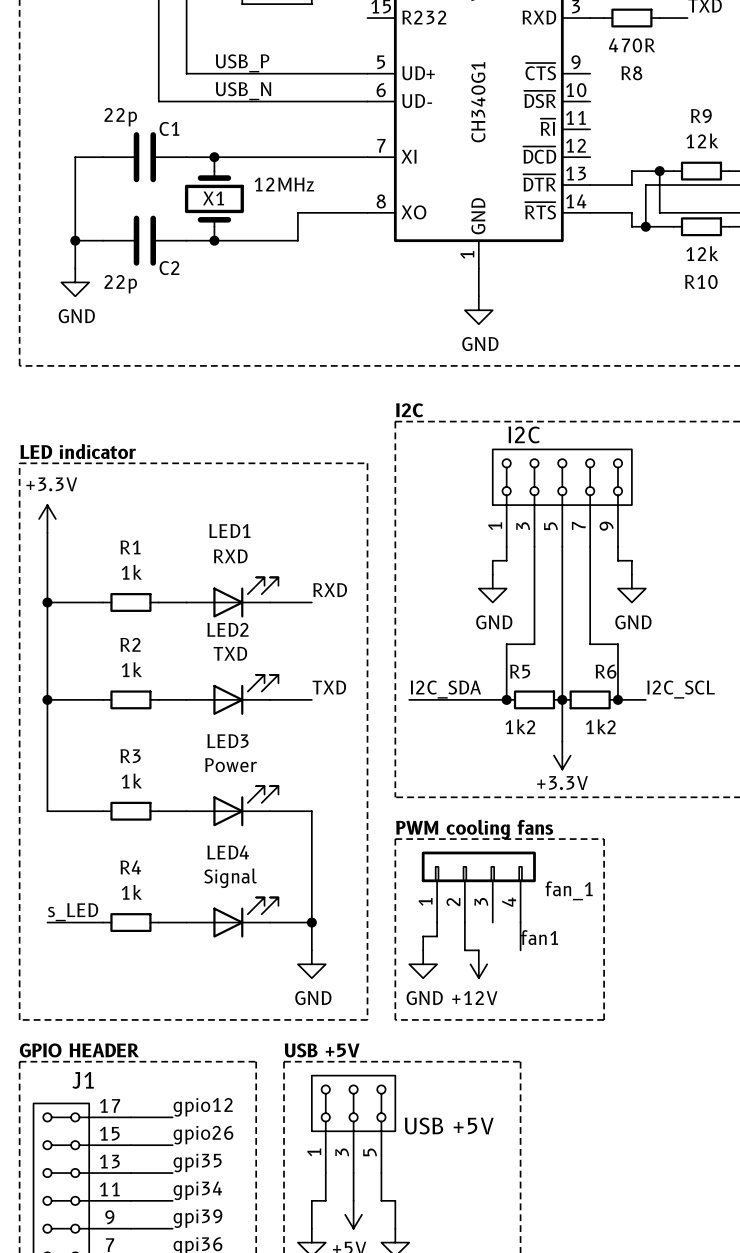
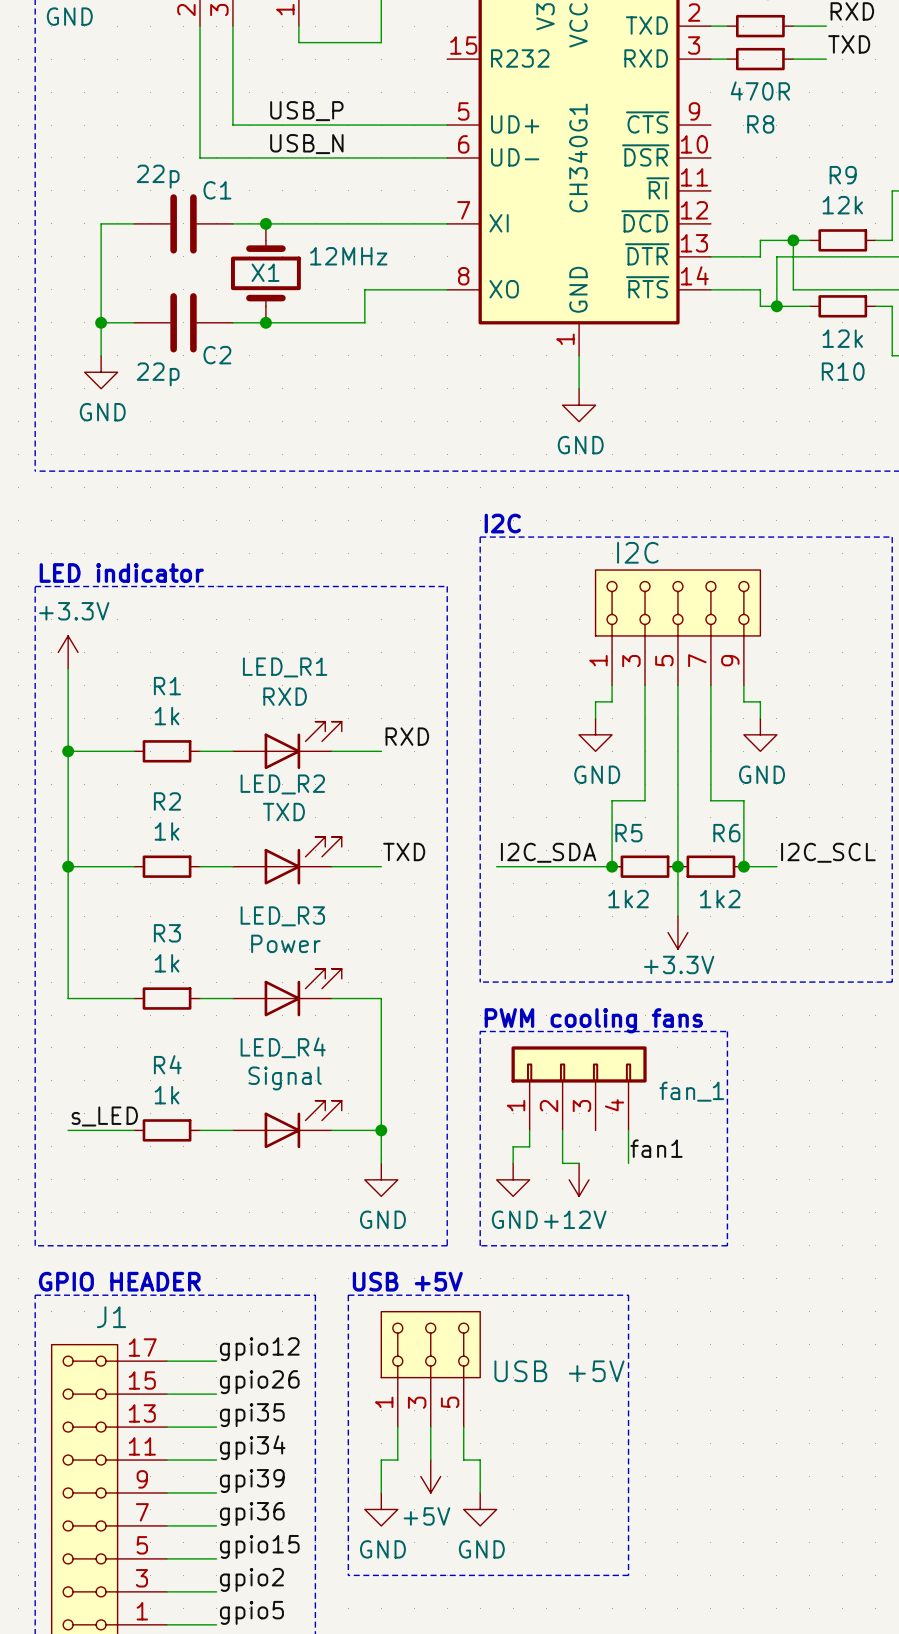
LED1 name: LED1 (229, 531) -> LED_R1 (285, 667)
LED2 name: LED2 (227, 629) -> LED_R2 (282, 784)
LED3 name: LED3 (227, 741) -> LED_R3 (282, 916)
LED4 name: LED4 (228, 852) -> LED_R4 (283, 1047)

